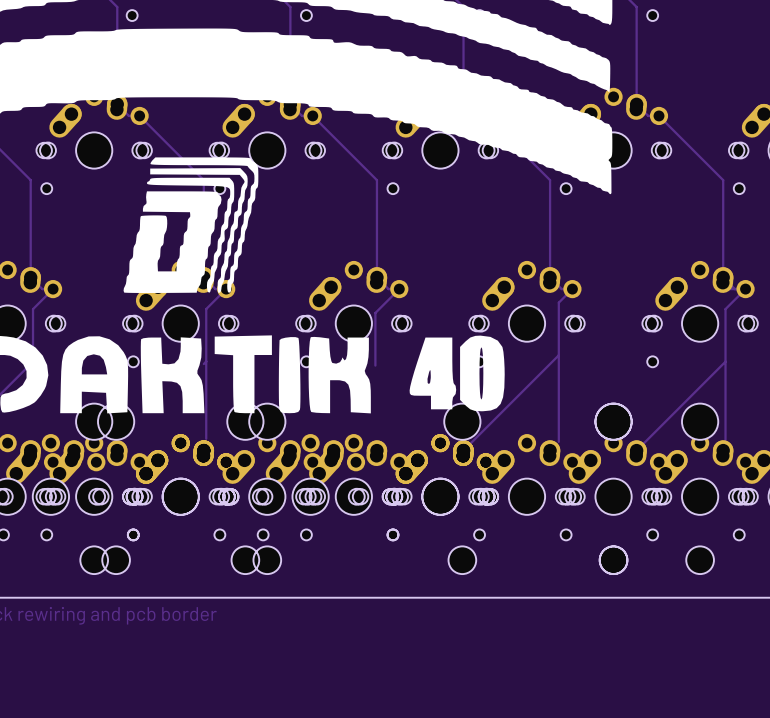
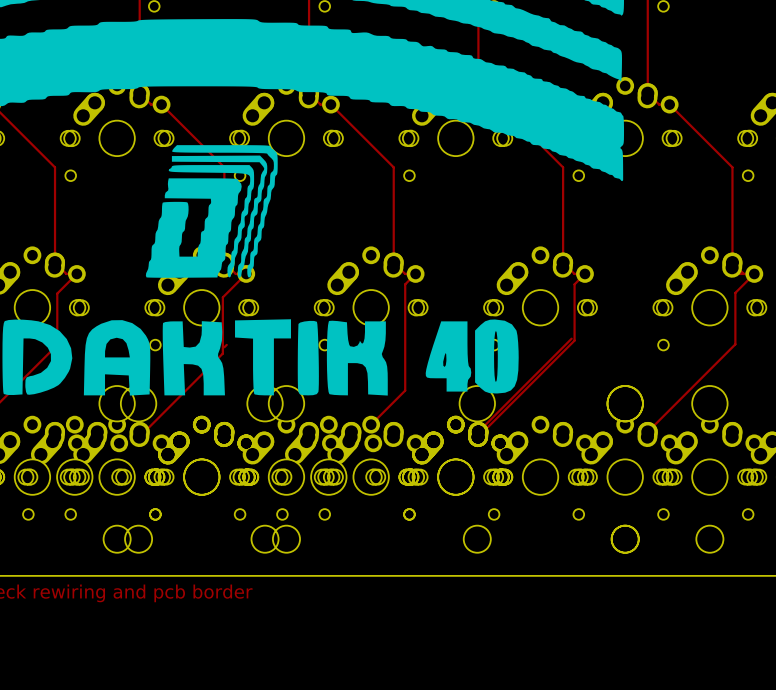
track: (388, 299) (375, 313) (375, 365) -> (405, 284) (405, 390) (371, 424)
track: (561, 299) (558, 302) (558, 441) -> (574, 284) (574, 340) (478, 437)
track: (726, 308) (725, 448) -> (735, 292) (734, 344)
track: (206, 309) (206, 438) -> (226, 293) (222, 297) (222, 353) (139, 437)

